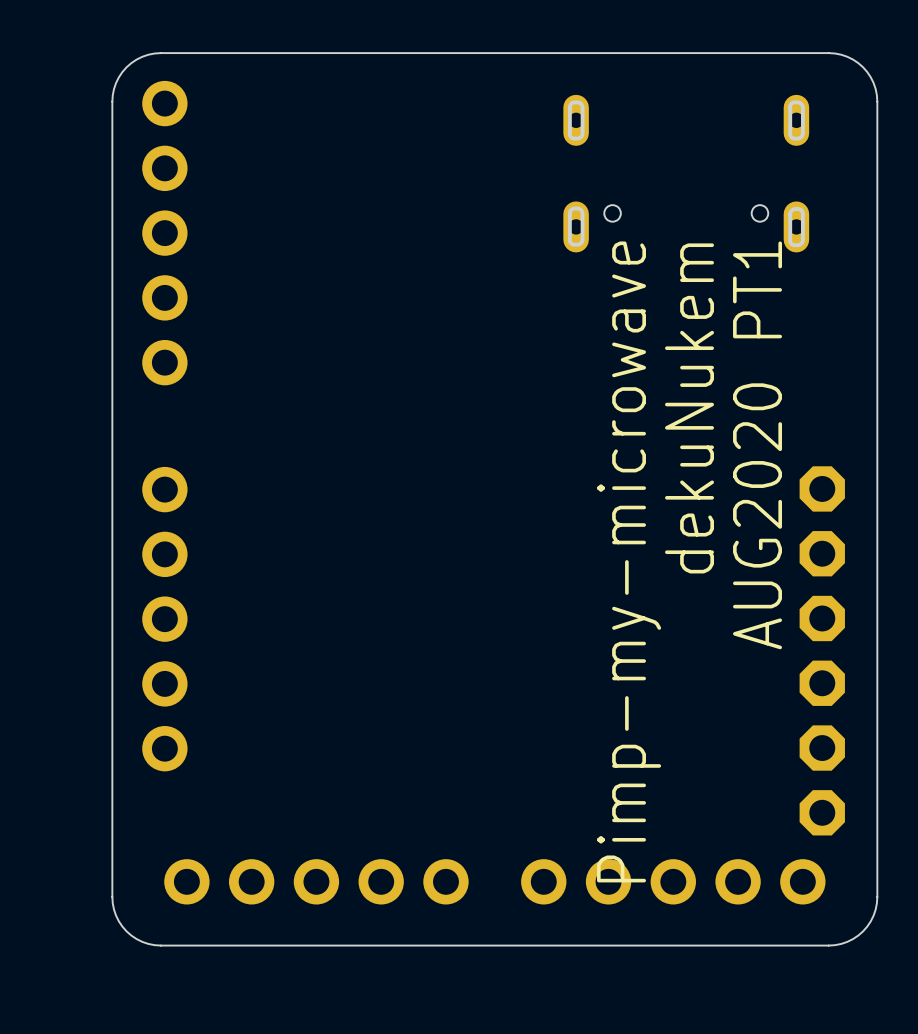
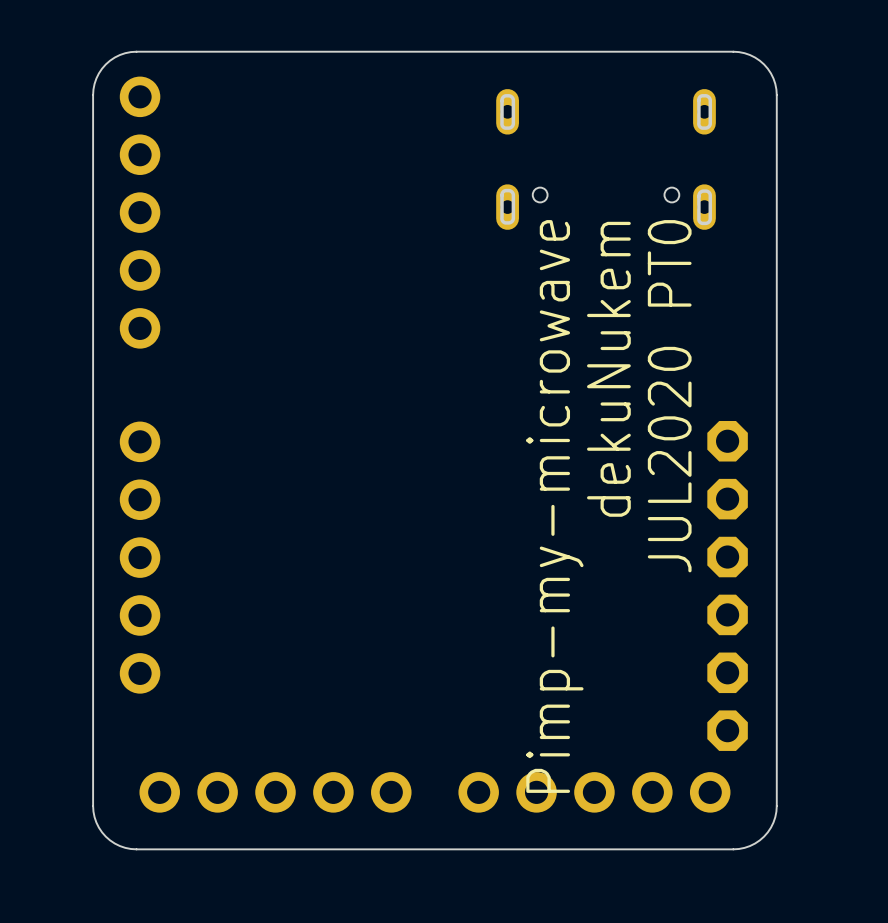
text: AUG2020 PT1 (757, 445) -> JUL2020 PT0 (669, 396)

